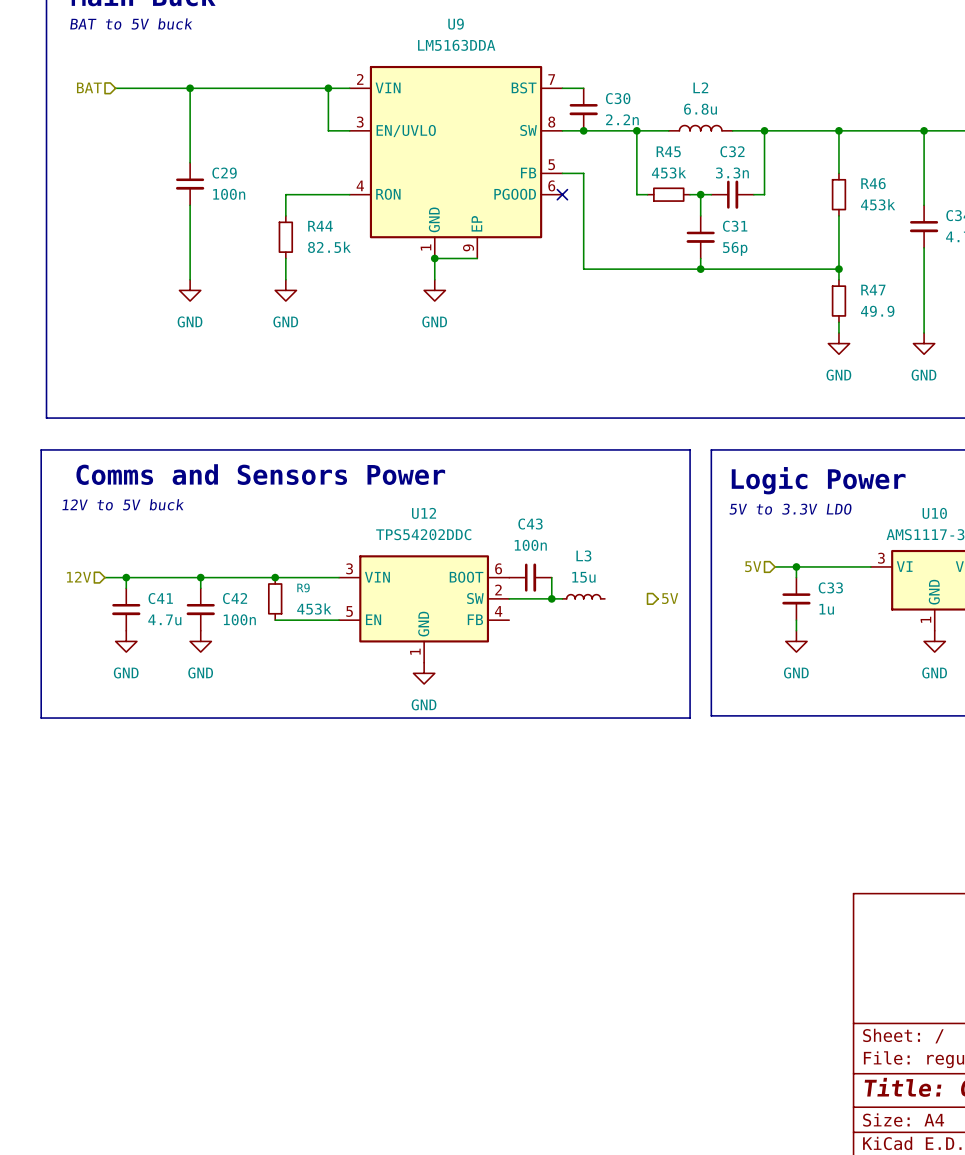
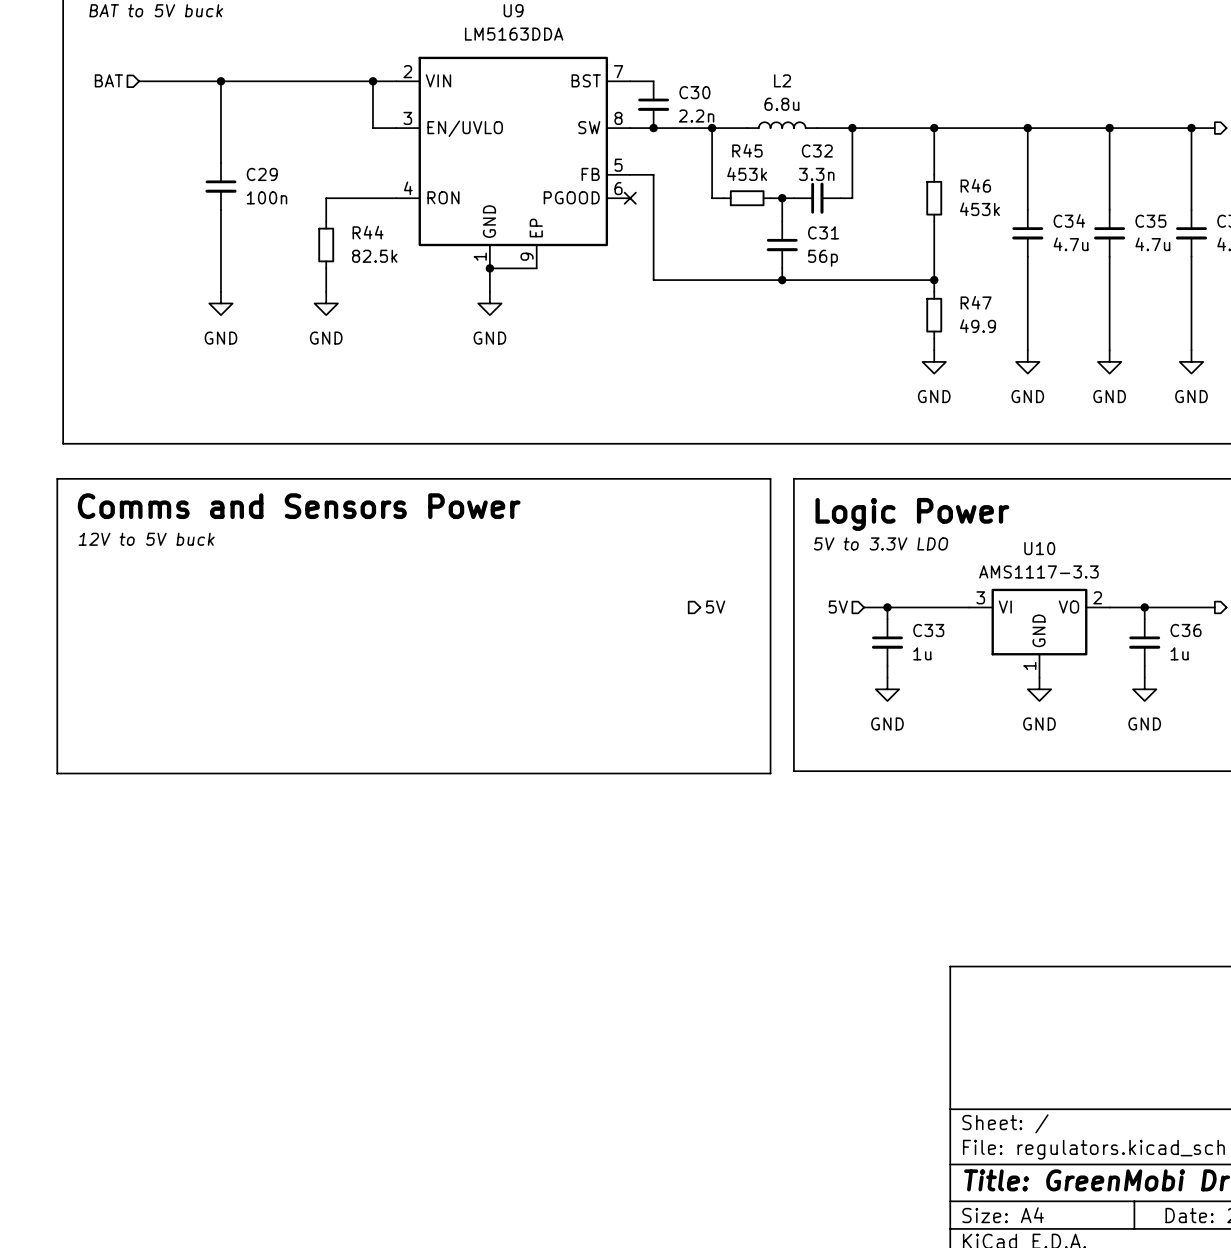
hierarchical label: 12V (79, 577) -> none
wire: (105, 577) (339, 577) -> none
wire: (126, 577) (126, 588) -> none
junction: (126, 577) -> none
wire: (200, 577) (200, 588) -> none
junction: (200, 577) -> none
junction: (275, 577) -> none
C43: 100n (530, 577) -> none
wire: (551, 577) (551, 598) -> none
L3: 15u (583, 596) -> none
R9: 453k (275, 598) -> none
wire: (509, 598) (562, 598) -> none
junction: (551, 598) -> none
hierarchical label position: 5V (670, 598) -> 5V (715, 607)
U12: TPS54202DDC (424, 608) -> none
C41: 4.7u (126, 609) -> none
C42: 100n (200, 609) -> none
wire: (275, 620) (339, 620) -> none
power symbol: GND (126, 641) -> none
power symbol: GND (200, 641) -> none
power symbol: GND (424, 673) -> none

